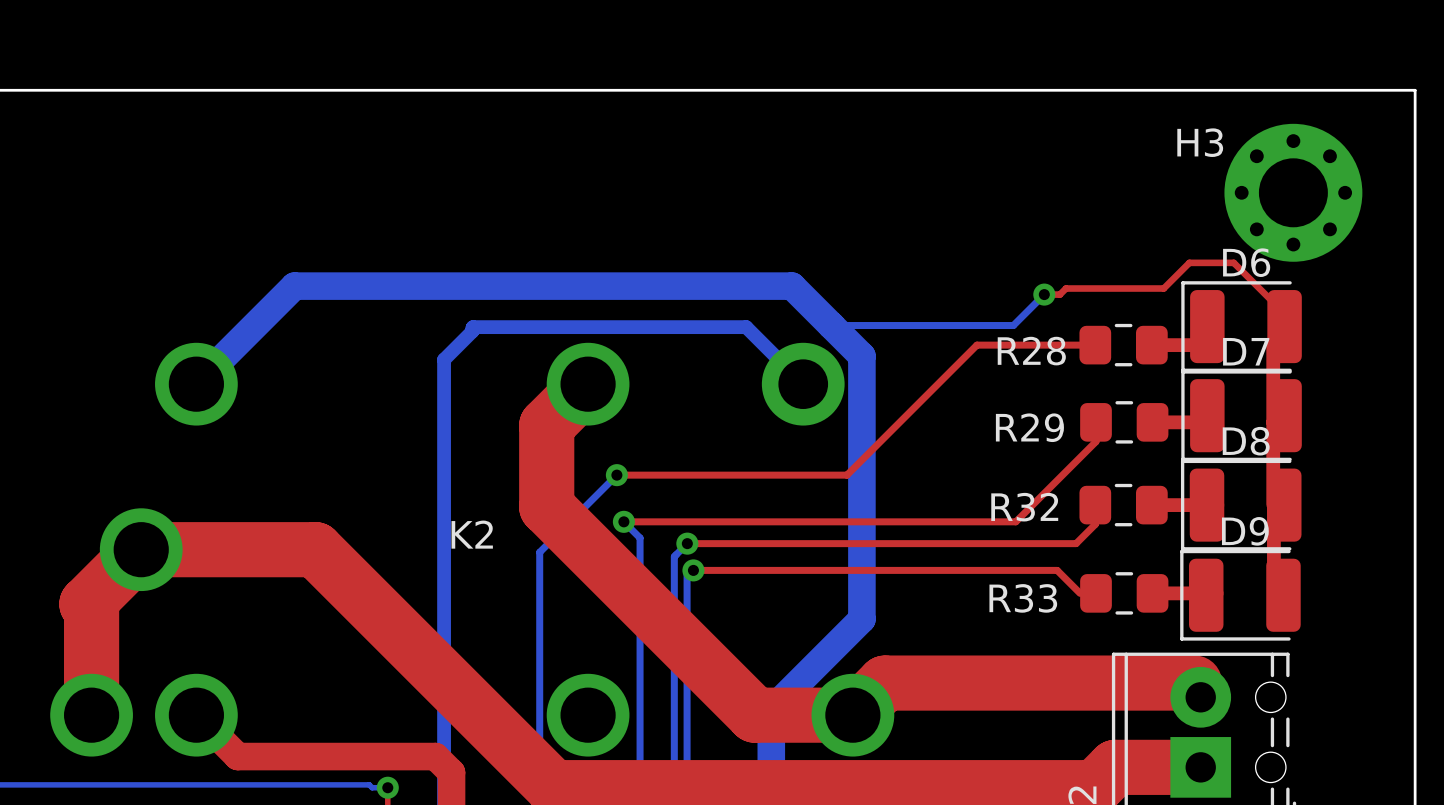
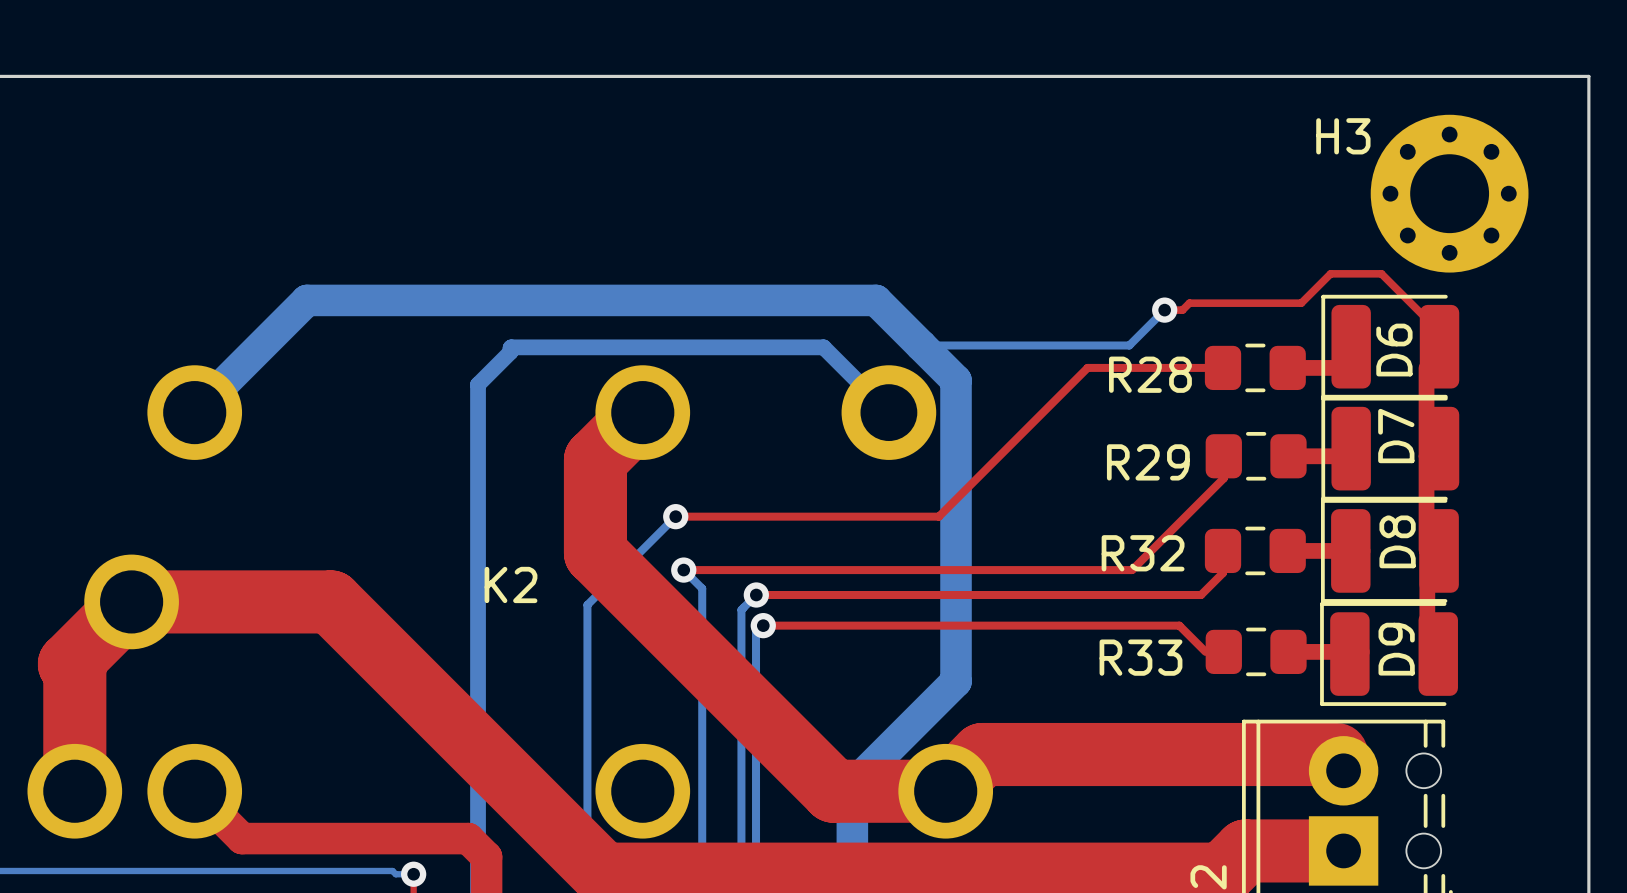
D6 name rotation: 0° (1246, 262) -> 90° counterclockwise (1394, 350)
D7 name rotation: 0° (1246, 351) -> 90° counterclockwise (1396, 436)
D8 name rotation: 0° (1246, 441) -> 90° counterclockwise (1397, 541)
D9 name rotation: 0° (1245, 531) -> 90° counterclockwise (1396, 649)

